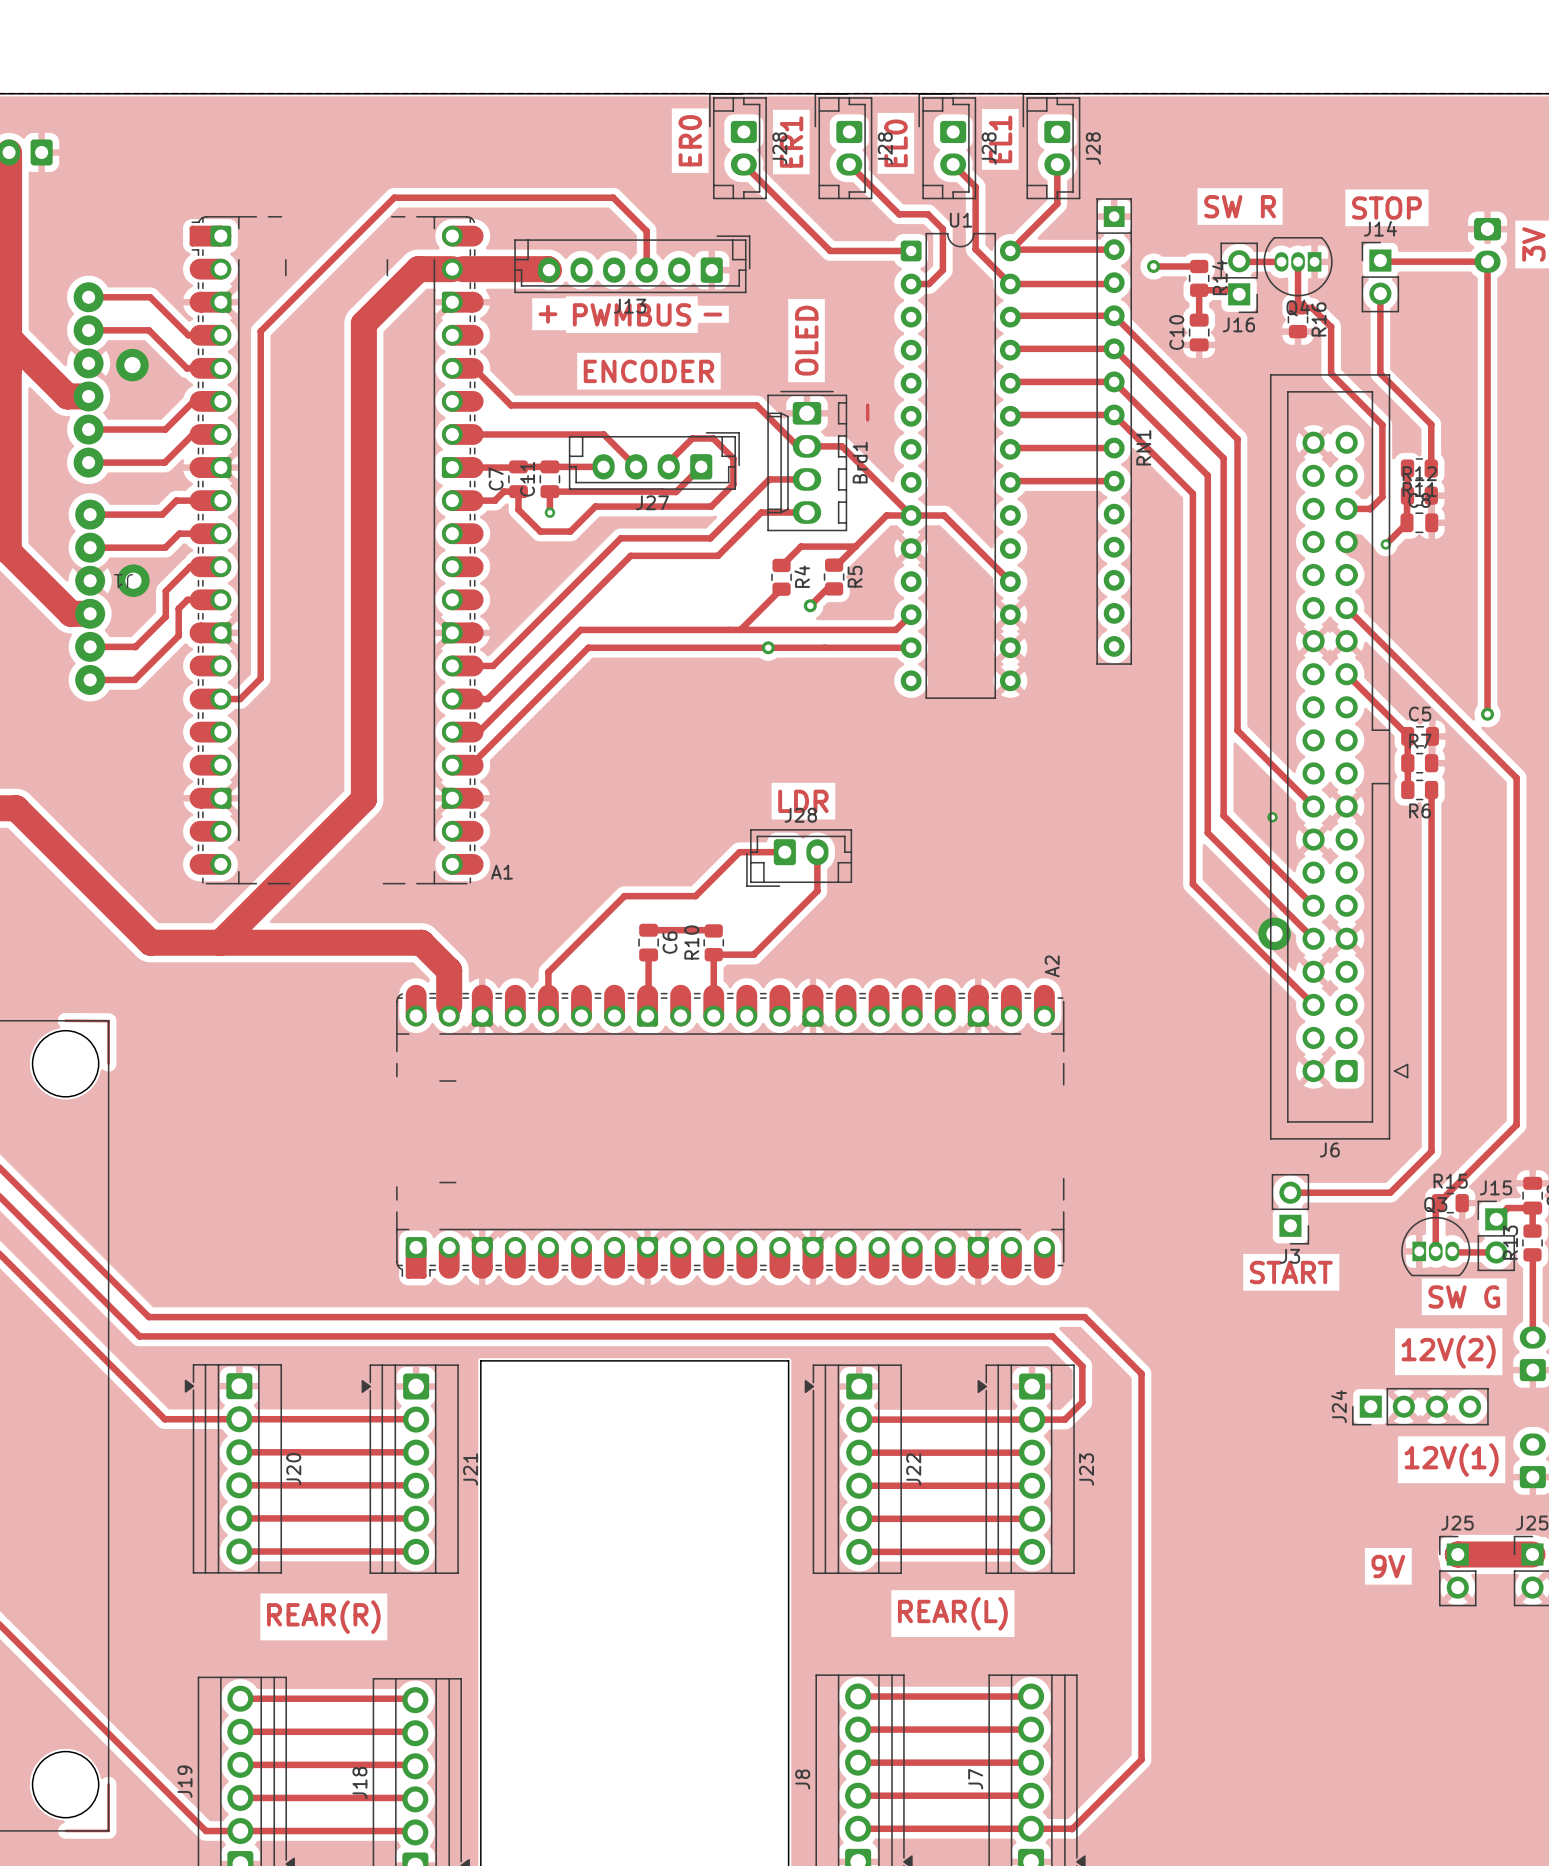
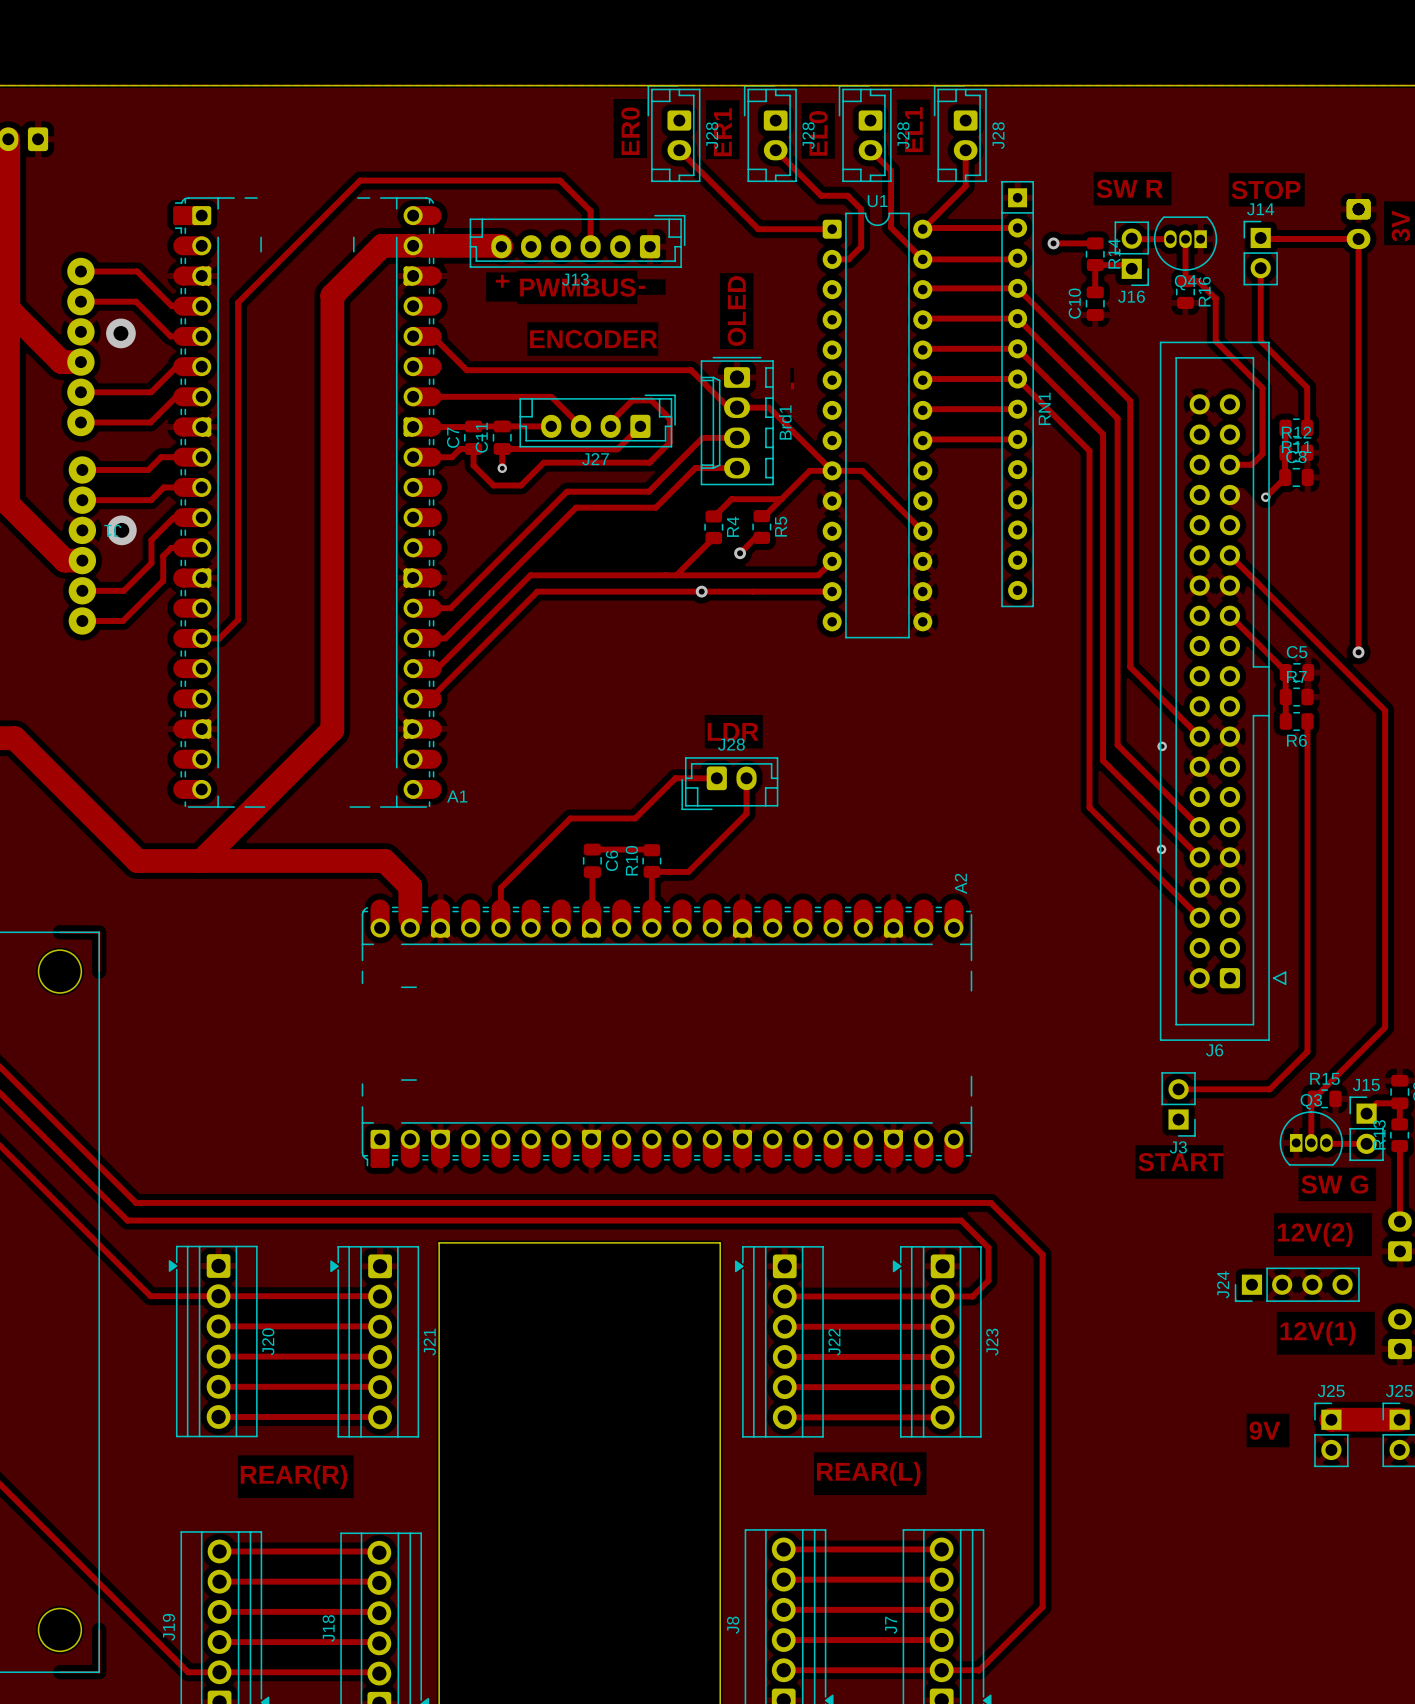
via size: [1258, 917, 1291, 951] -> [1156, 844, 1167, 855]
round board edge size: [31, 1030, 100, 1098] -> [37, 949, 82, 994]
round board edge size: [31, 1750, 100, 1819] -> [37, 1607, 82, 1652]

